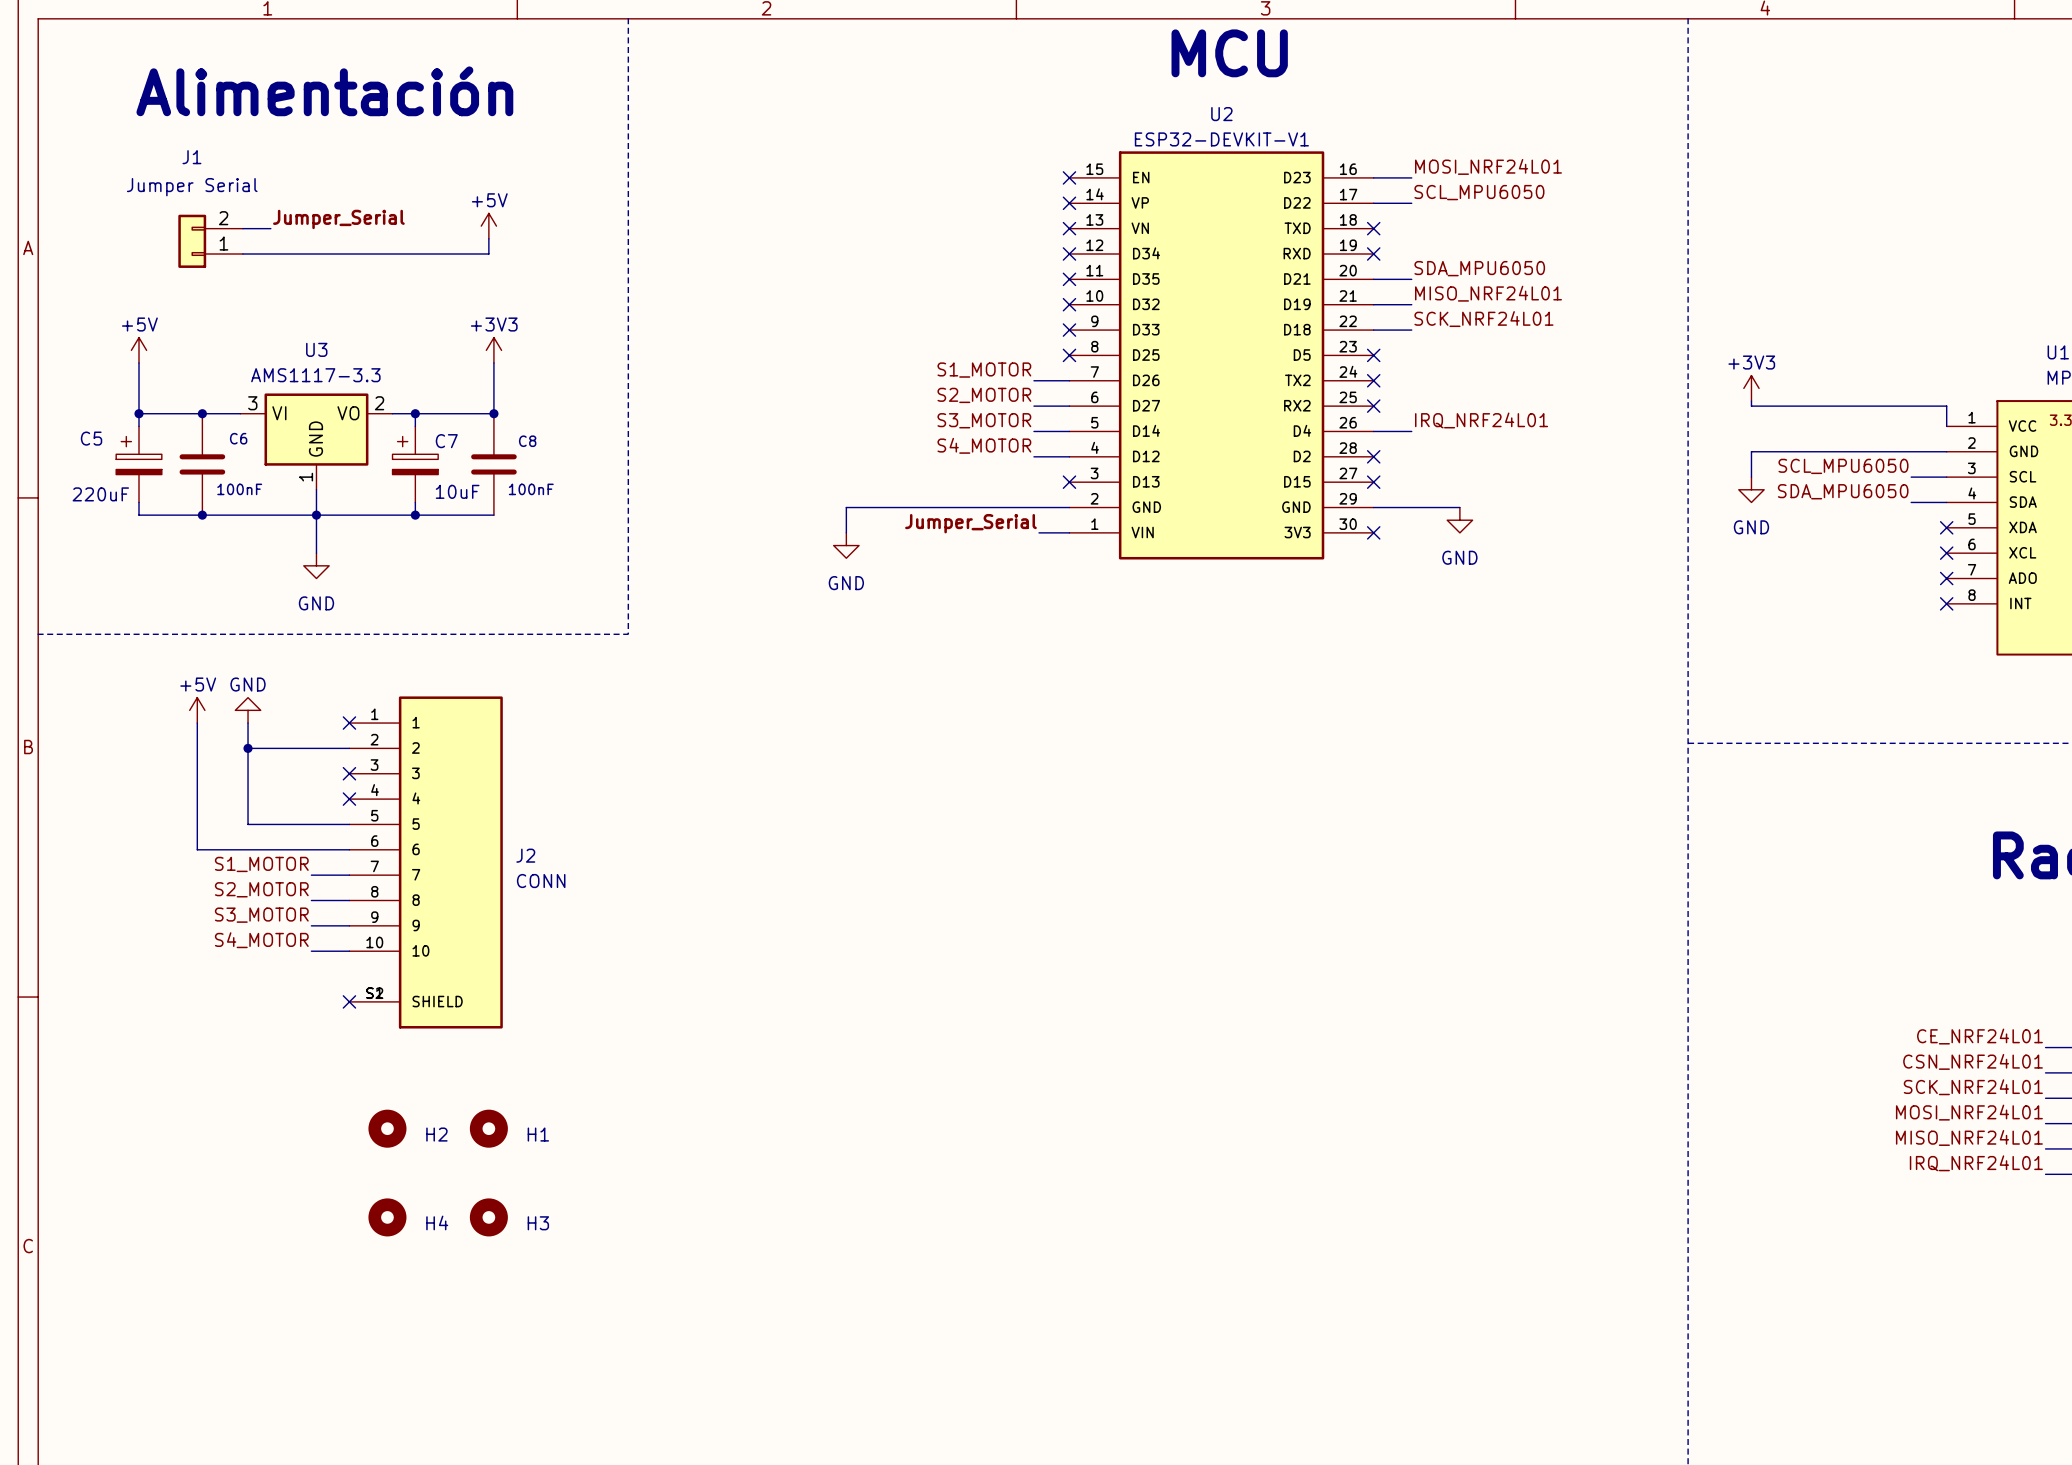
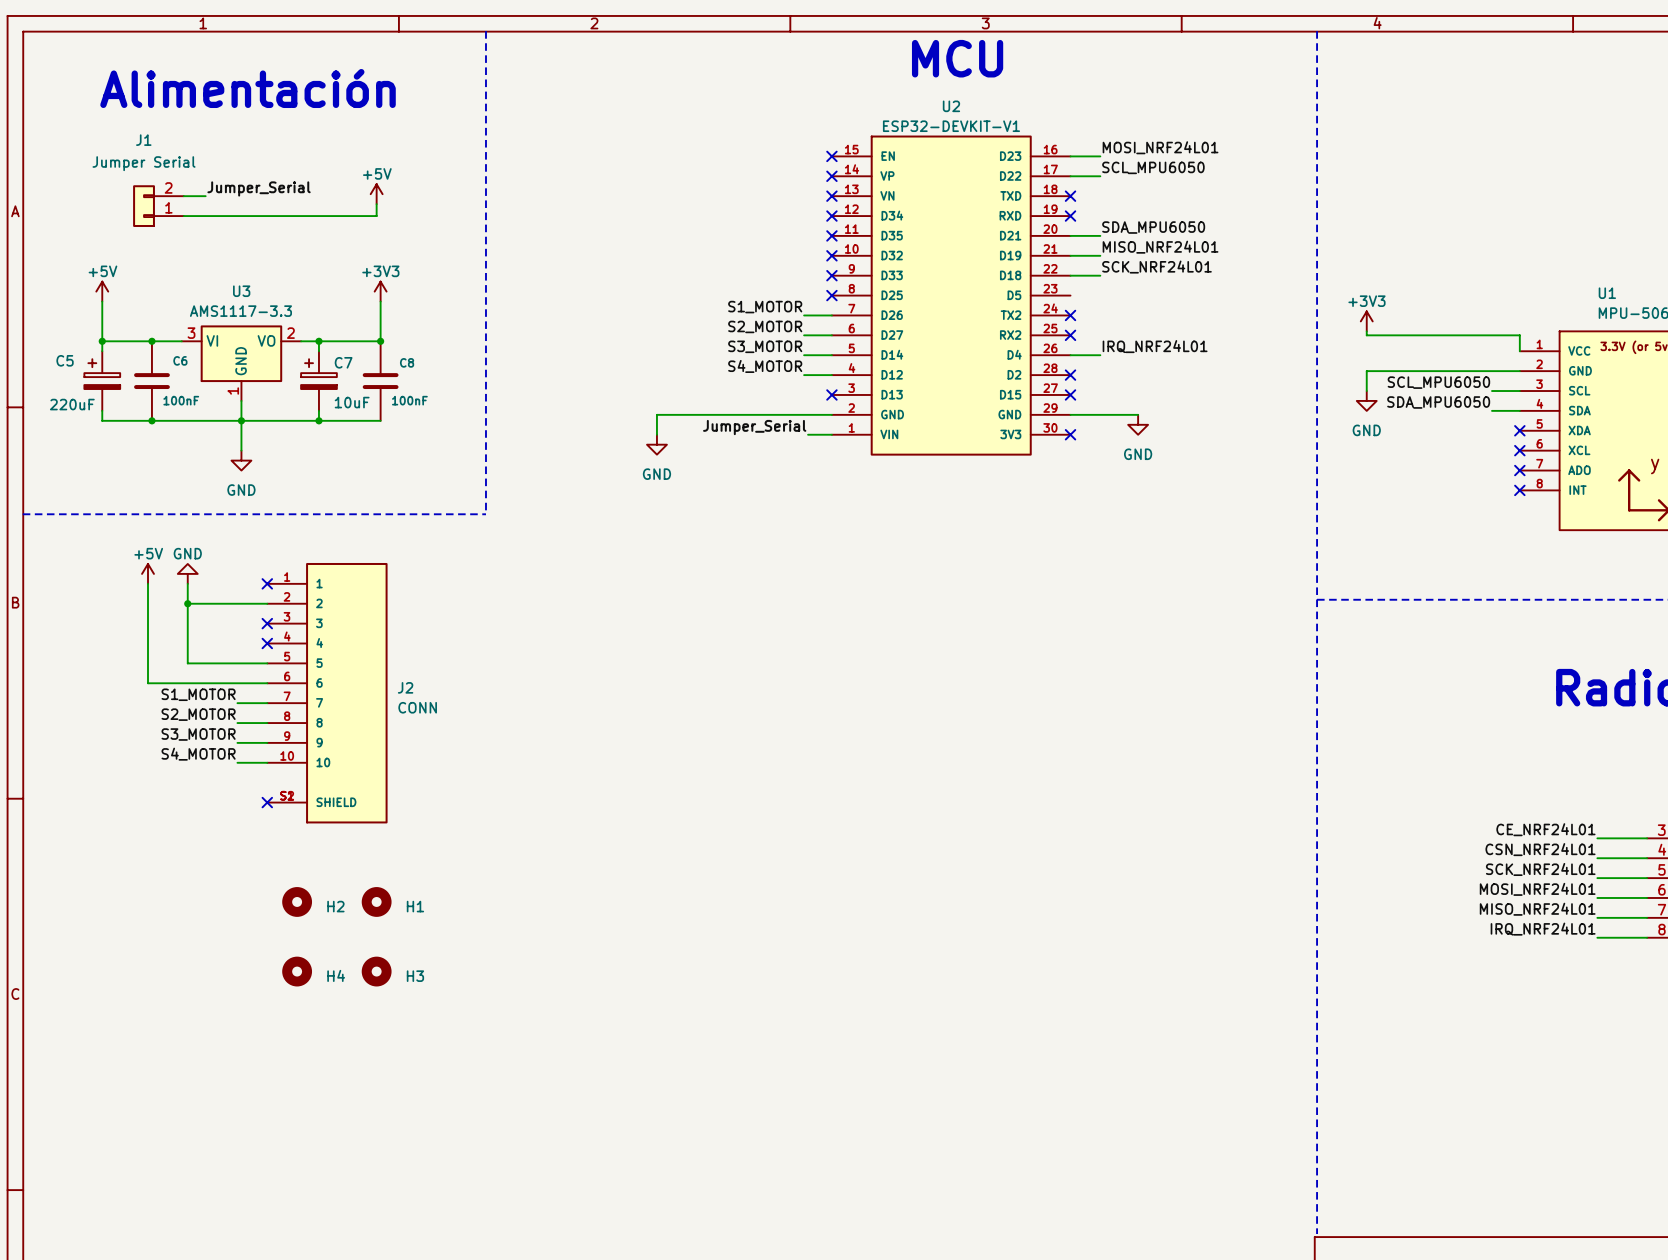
no-connect mark: (1373, 355) -> none

